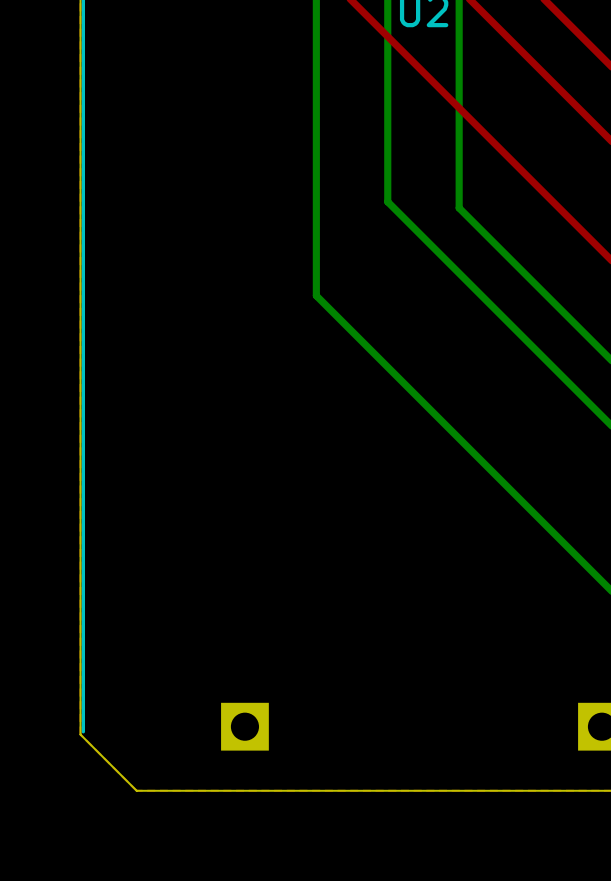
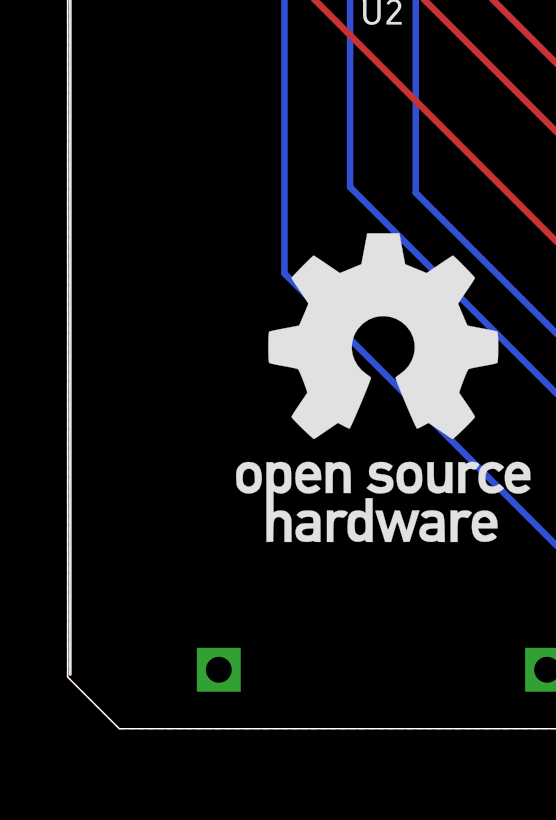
drawing: none -> [236, 233, 531, 543]

